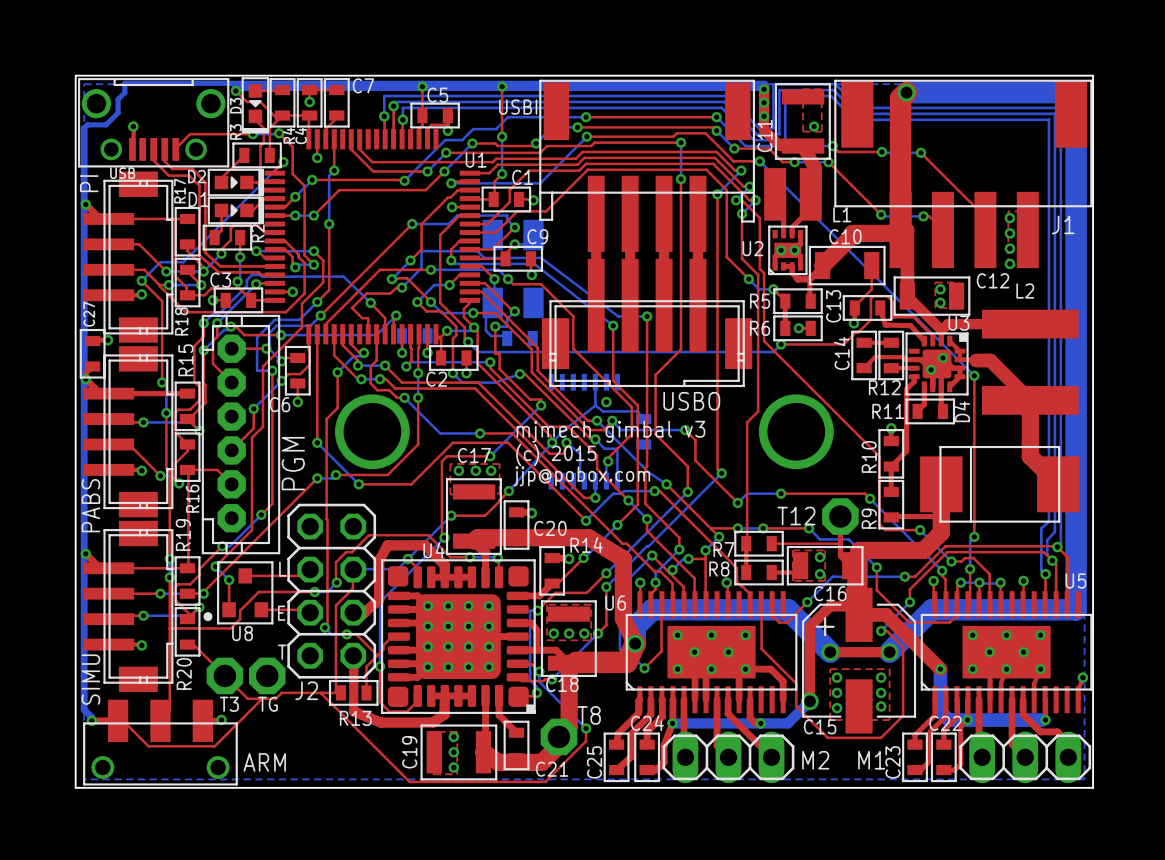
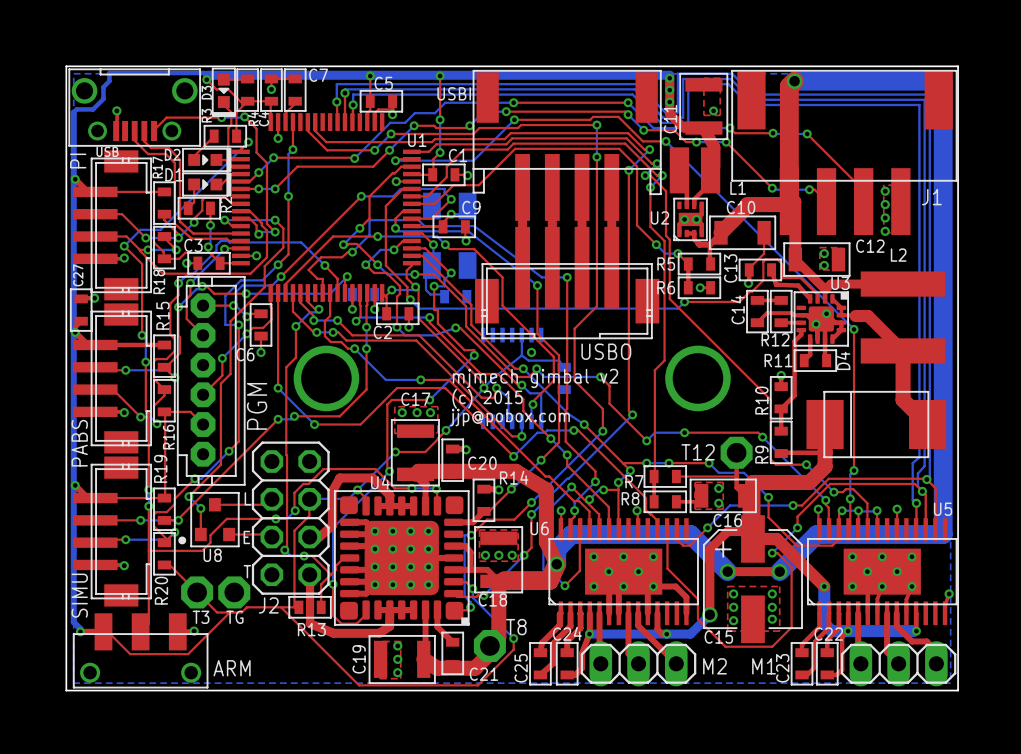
text: mjmech gimbal v3 (610, 431) -> mjmech gimbal v2 (535, 378)

